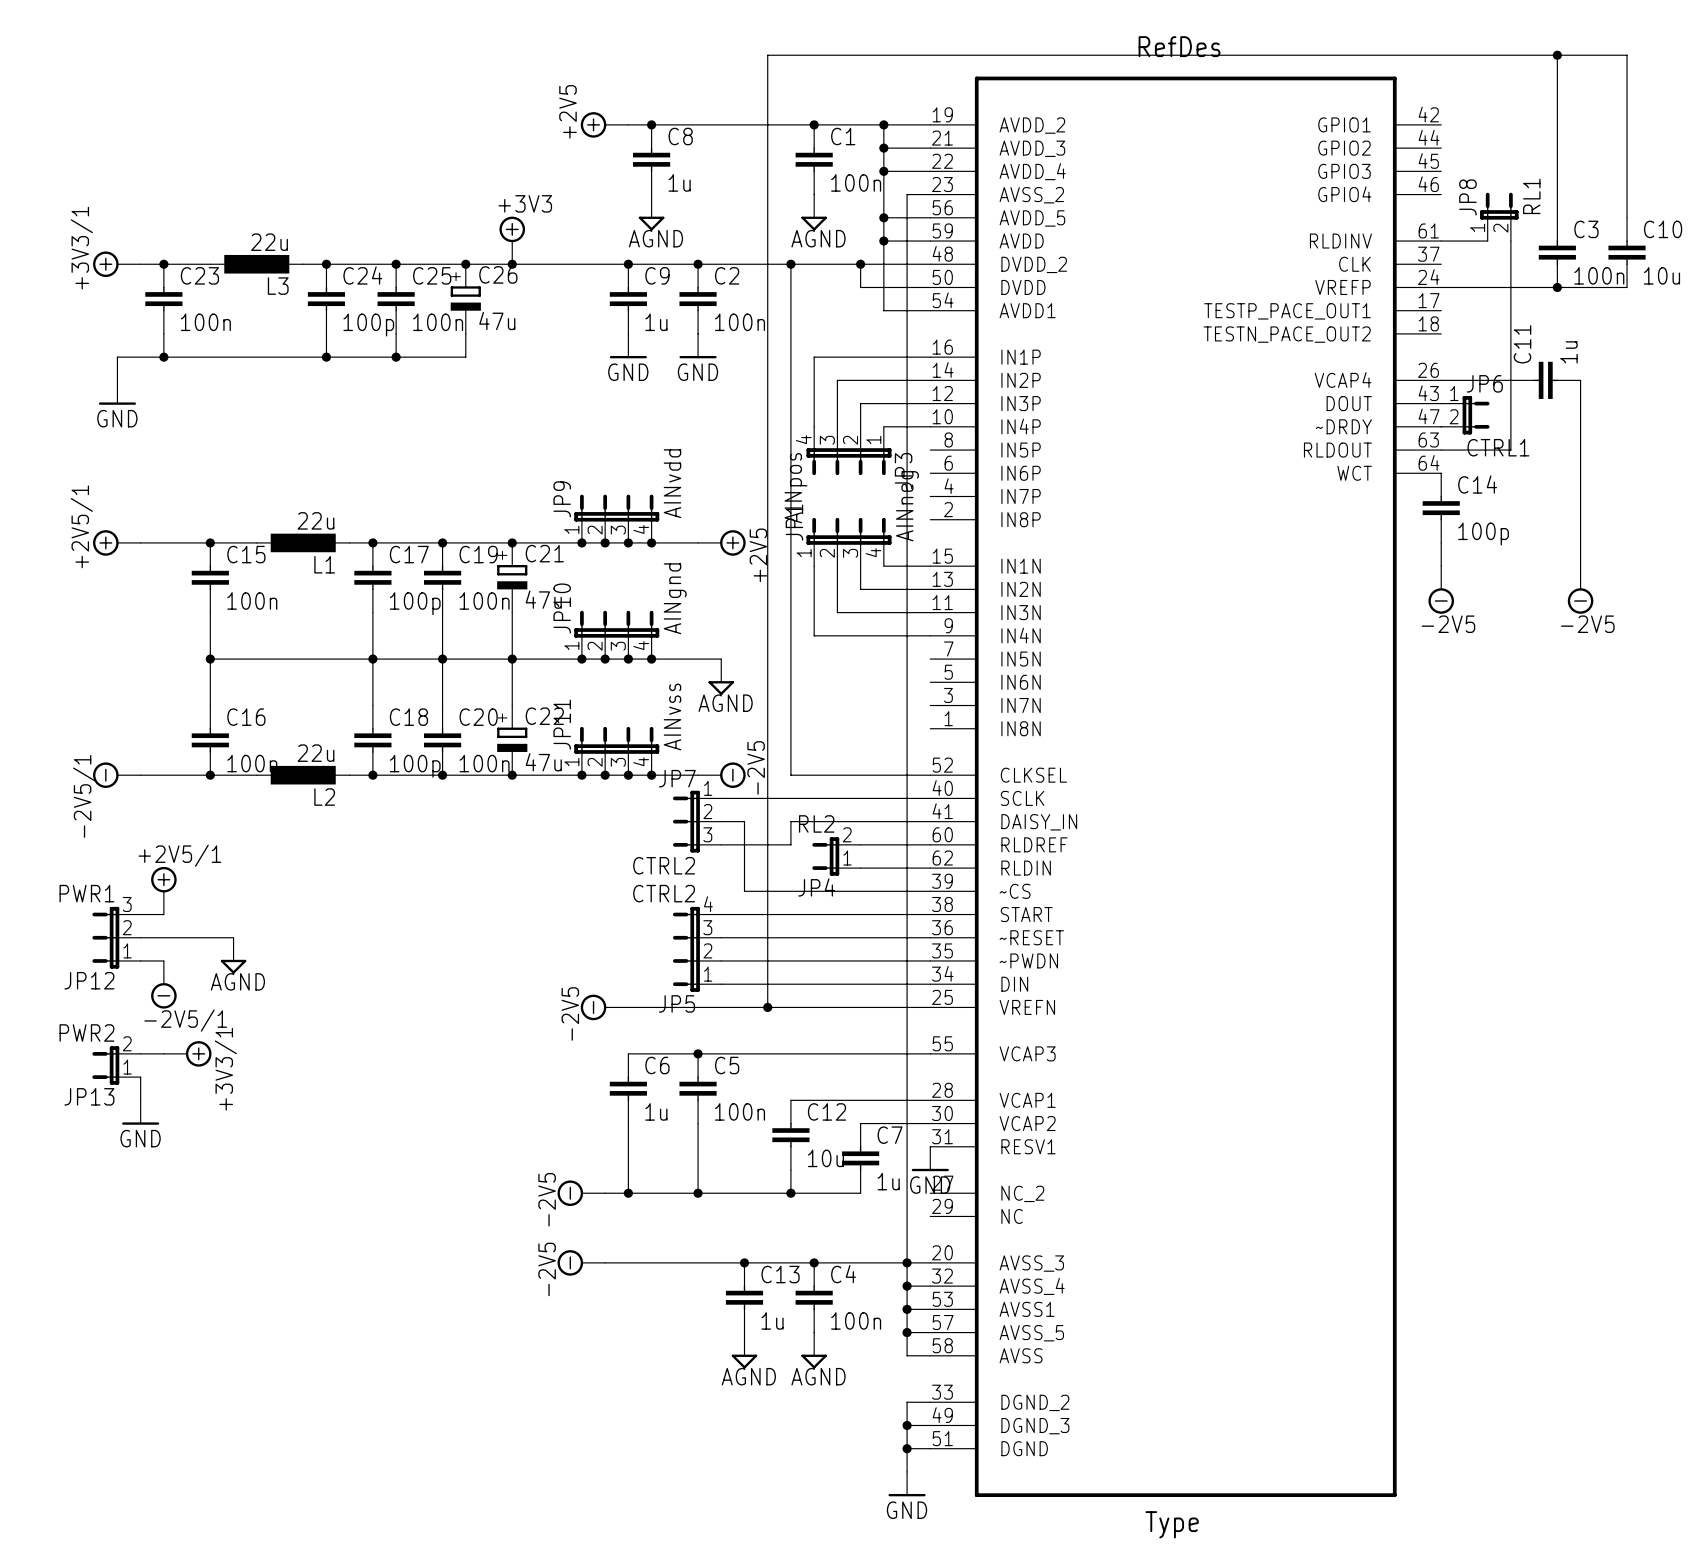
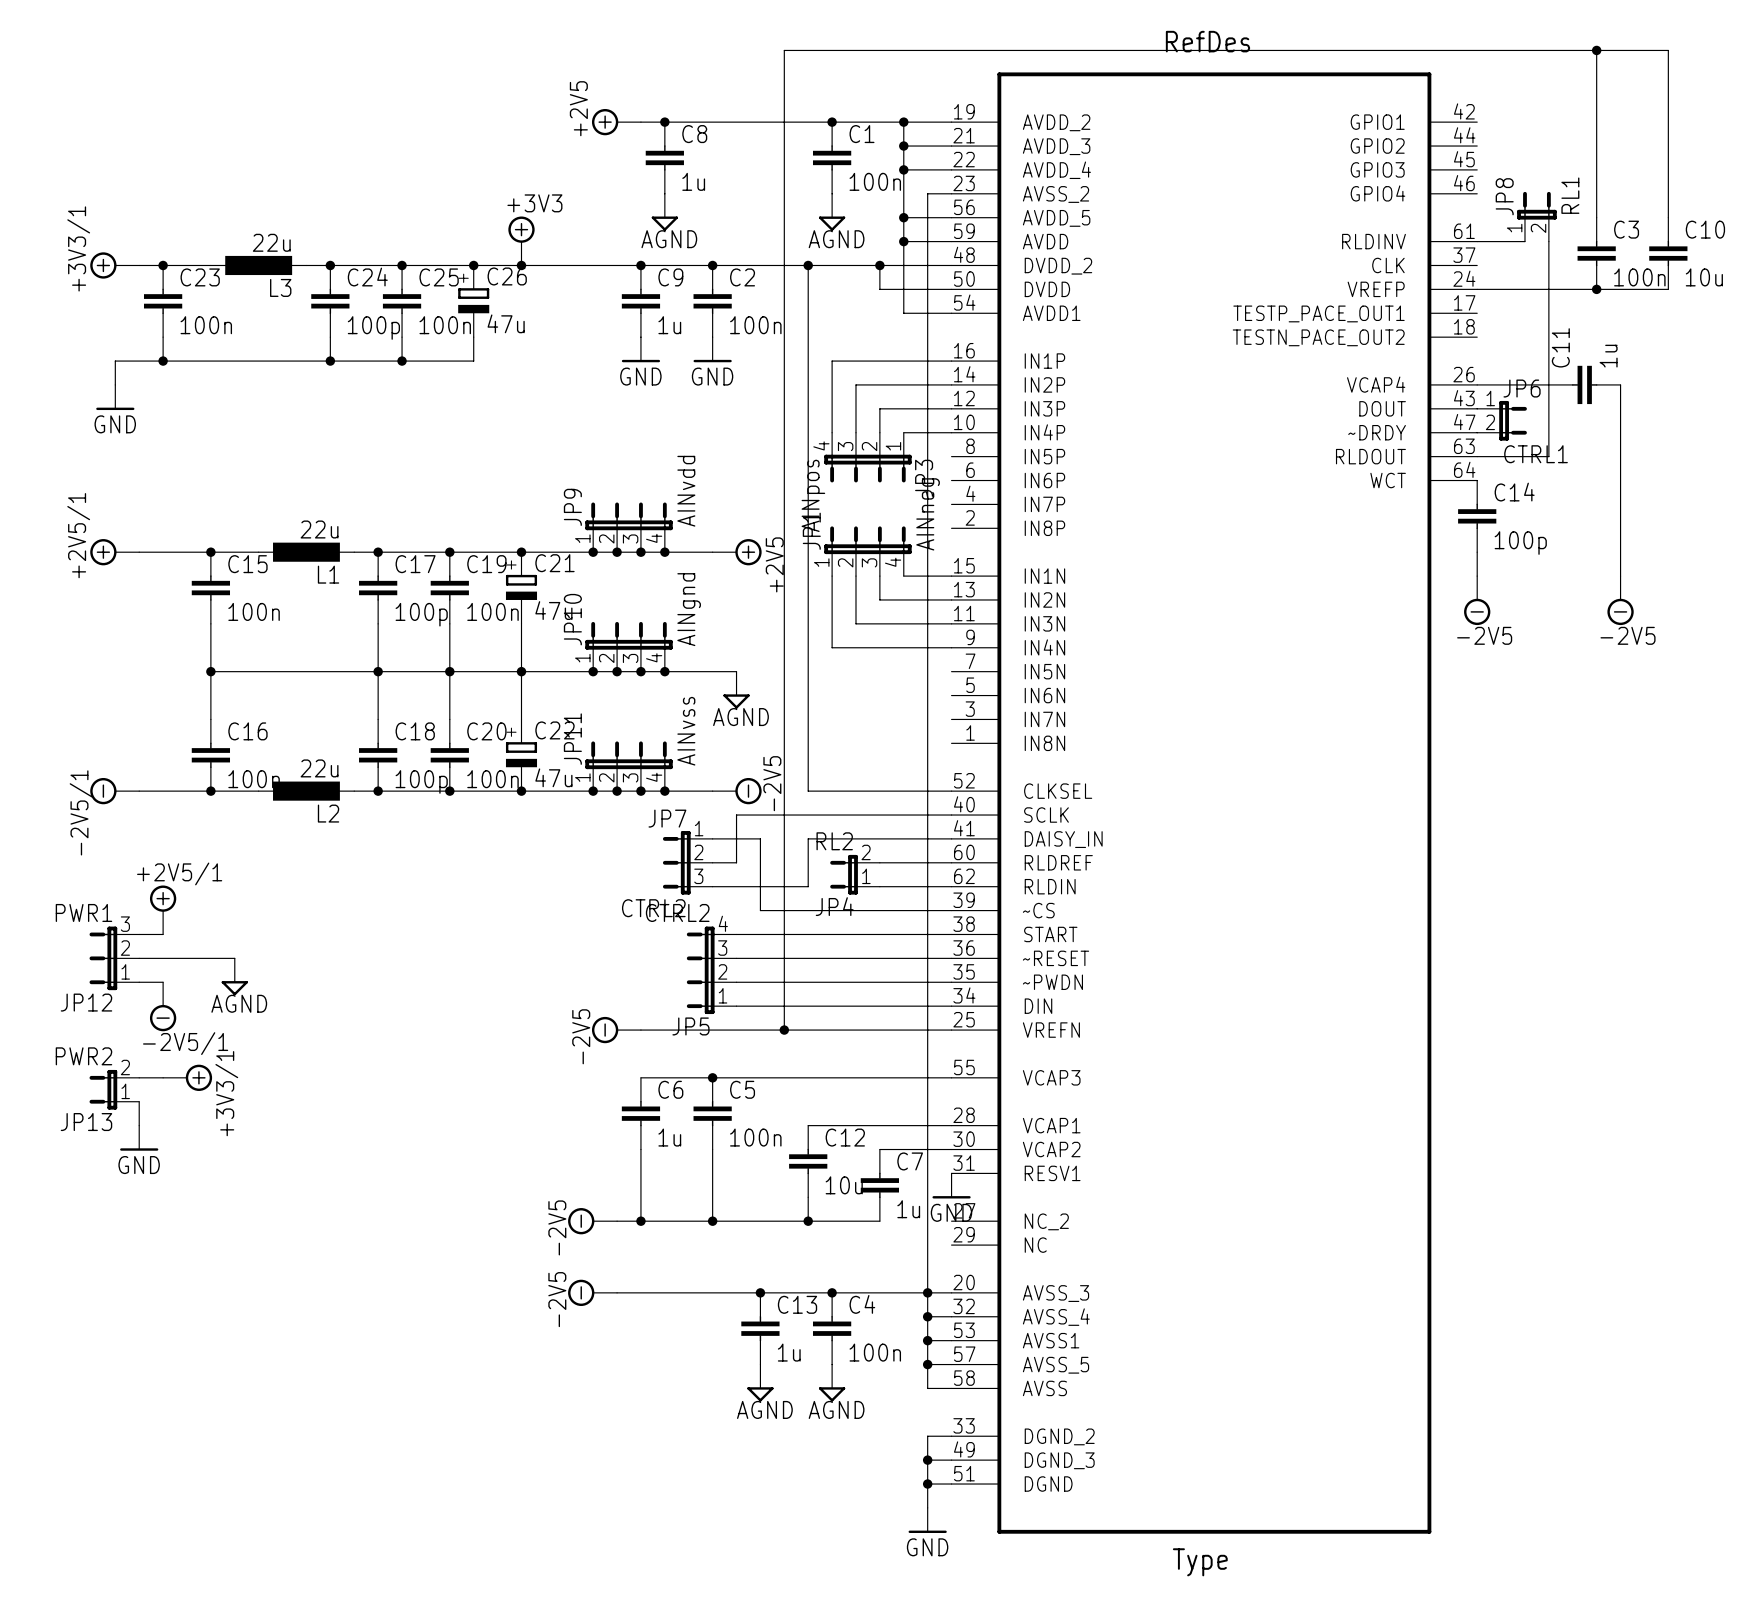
wire: none -> (736, 815) (736, 862) (712, 862)
JP7 position: (697, 821) -> (687, 862)
wire: (721, 844) (790, 844) -> (712, 886) (808, 886) (808, 862)

